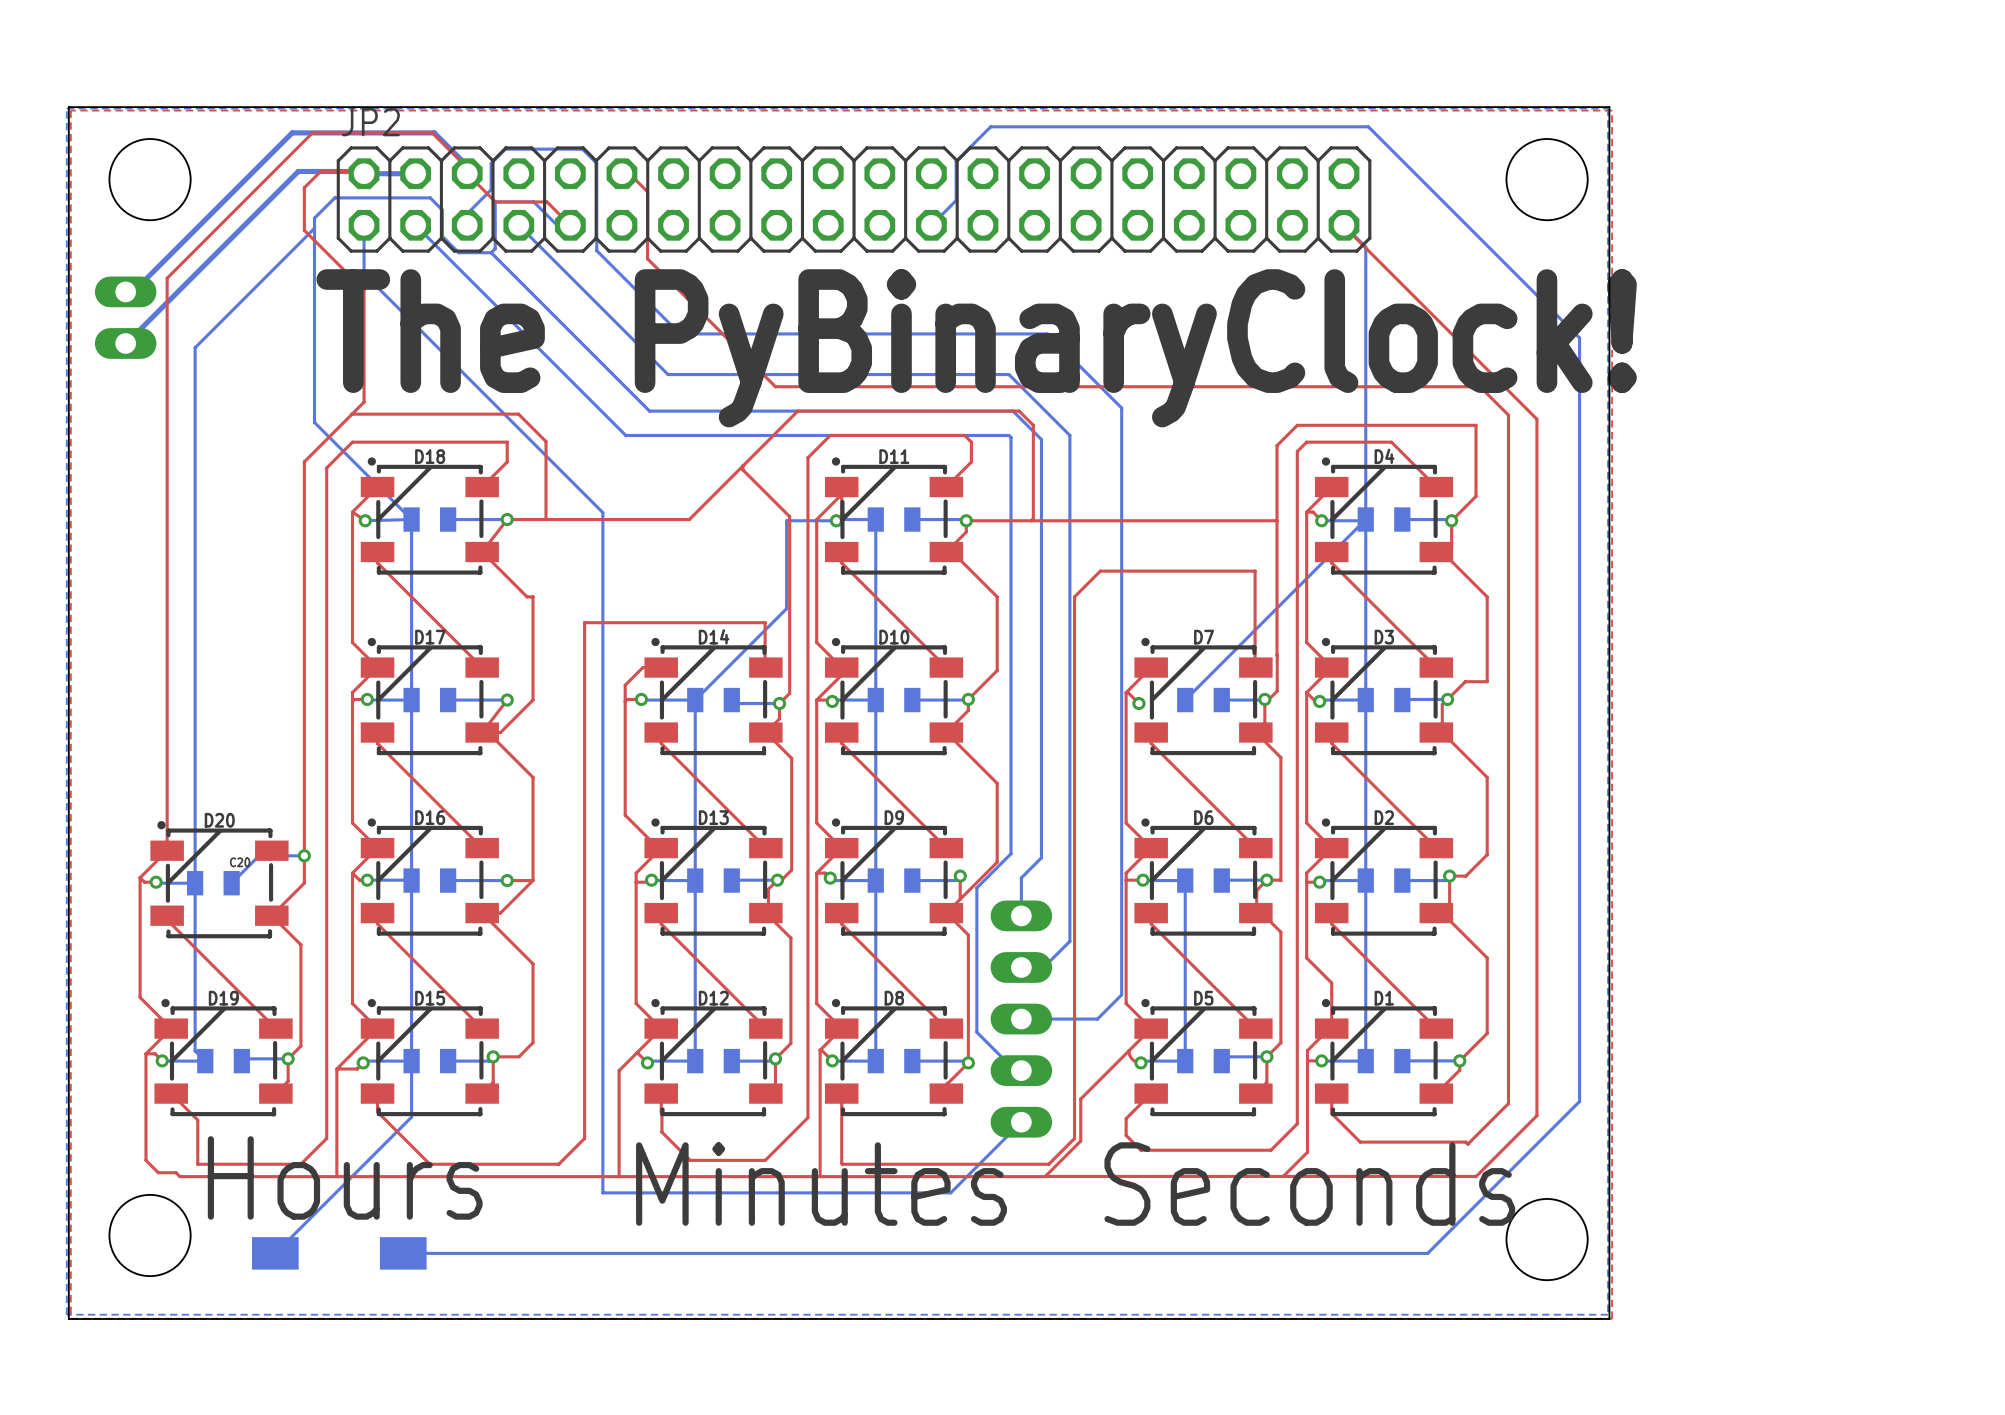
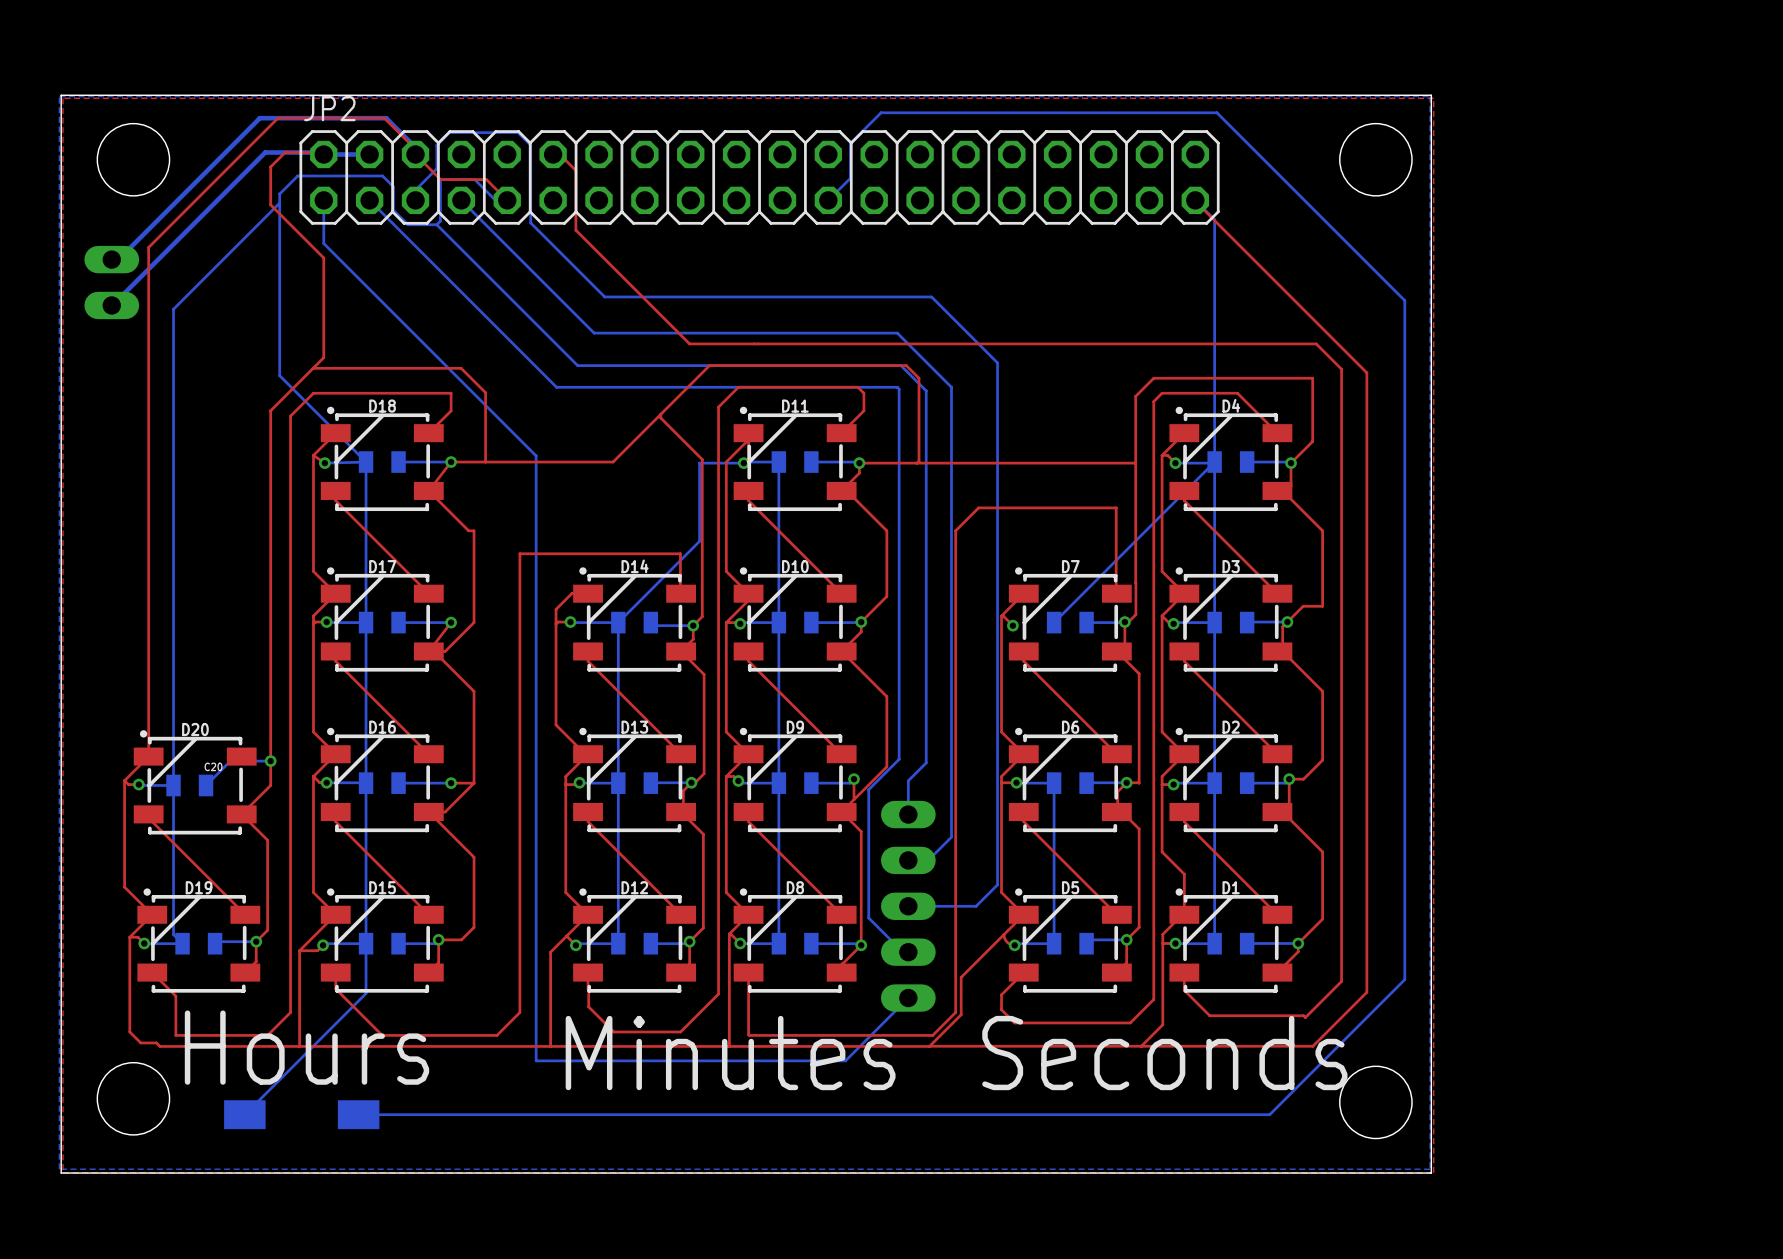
text: The PyBinaryClock! (976, 348) -> none

